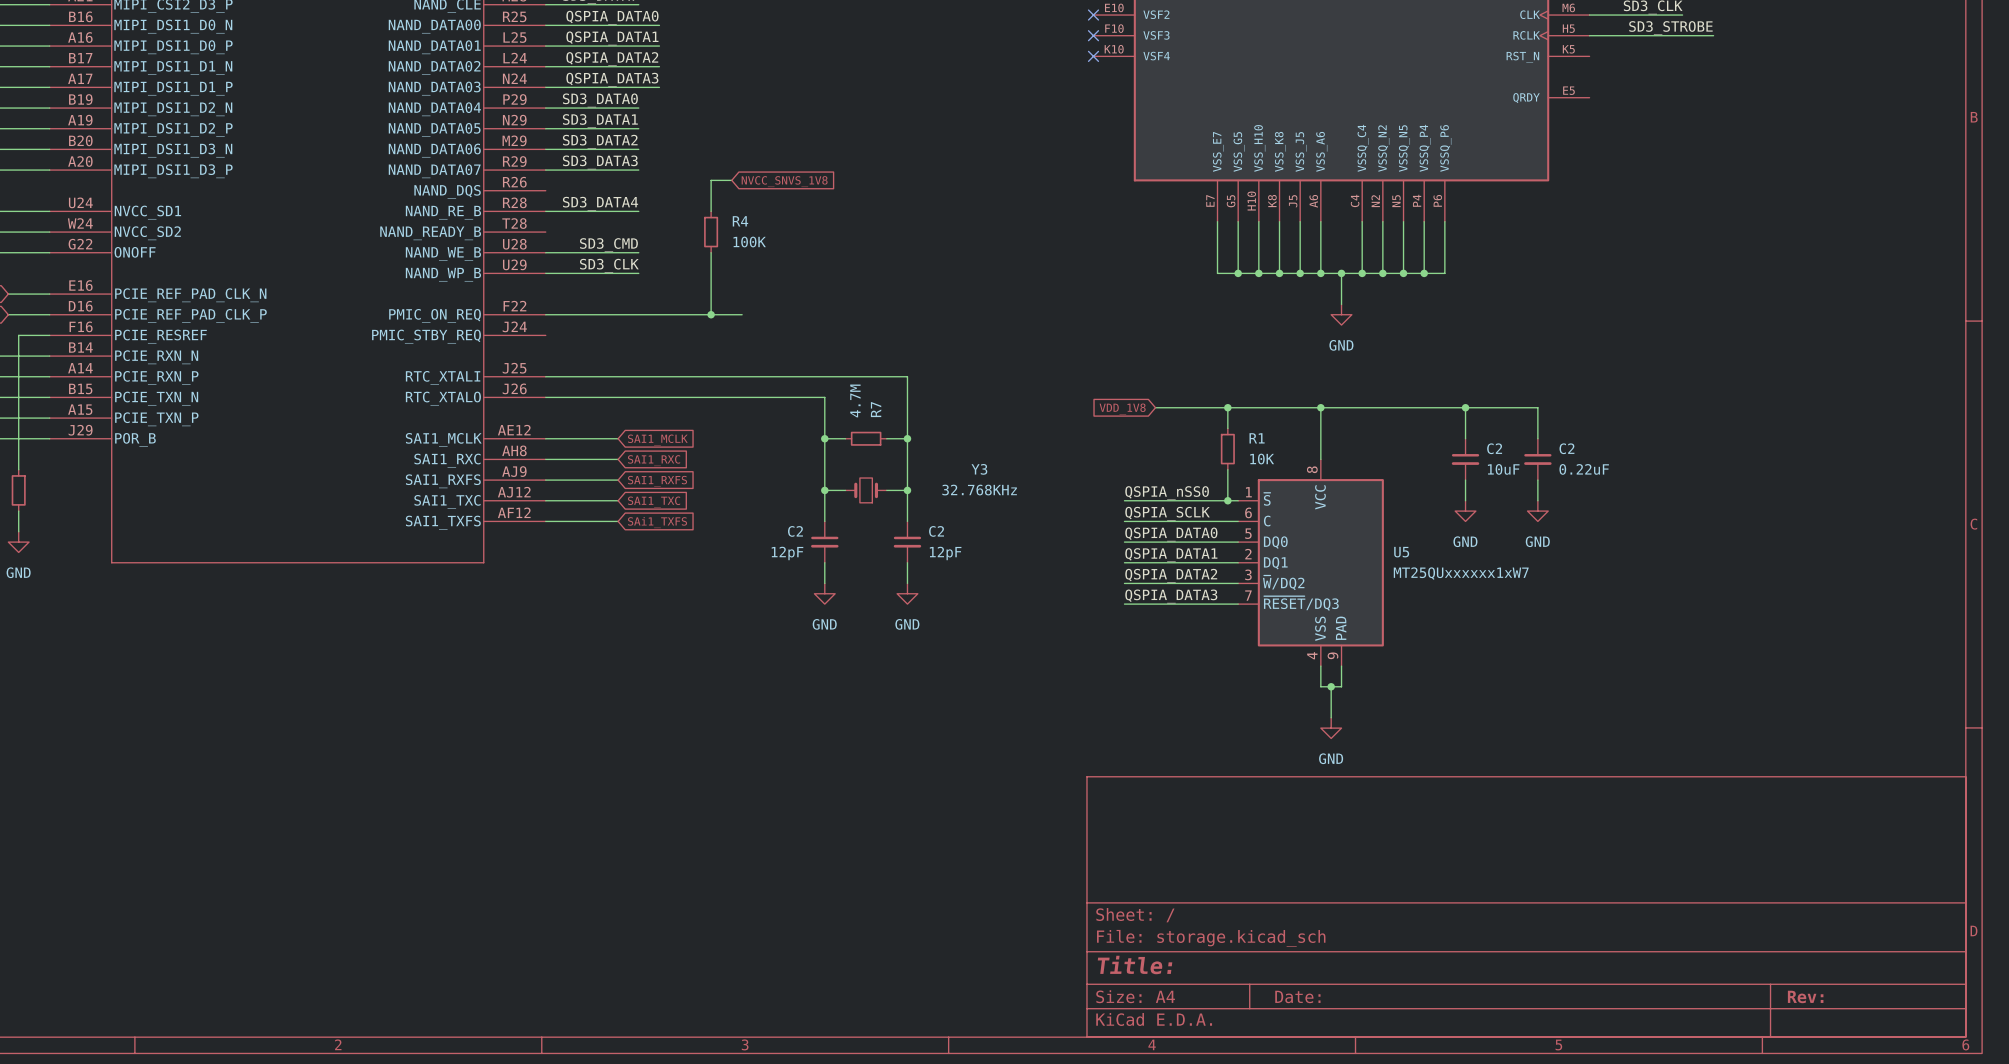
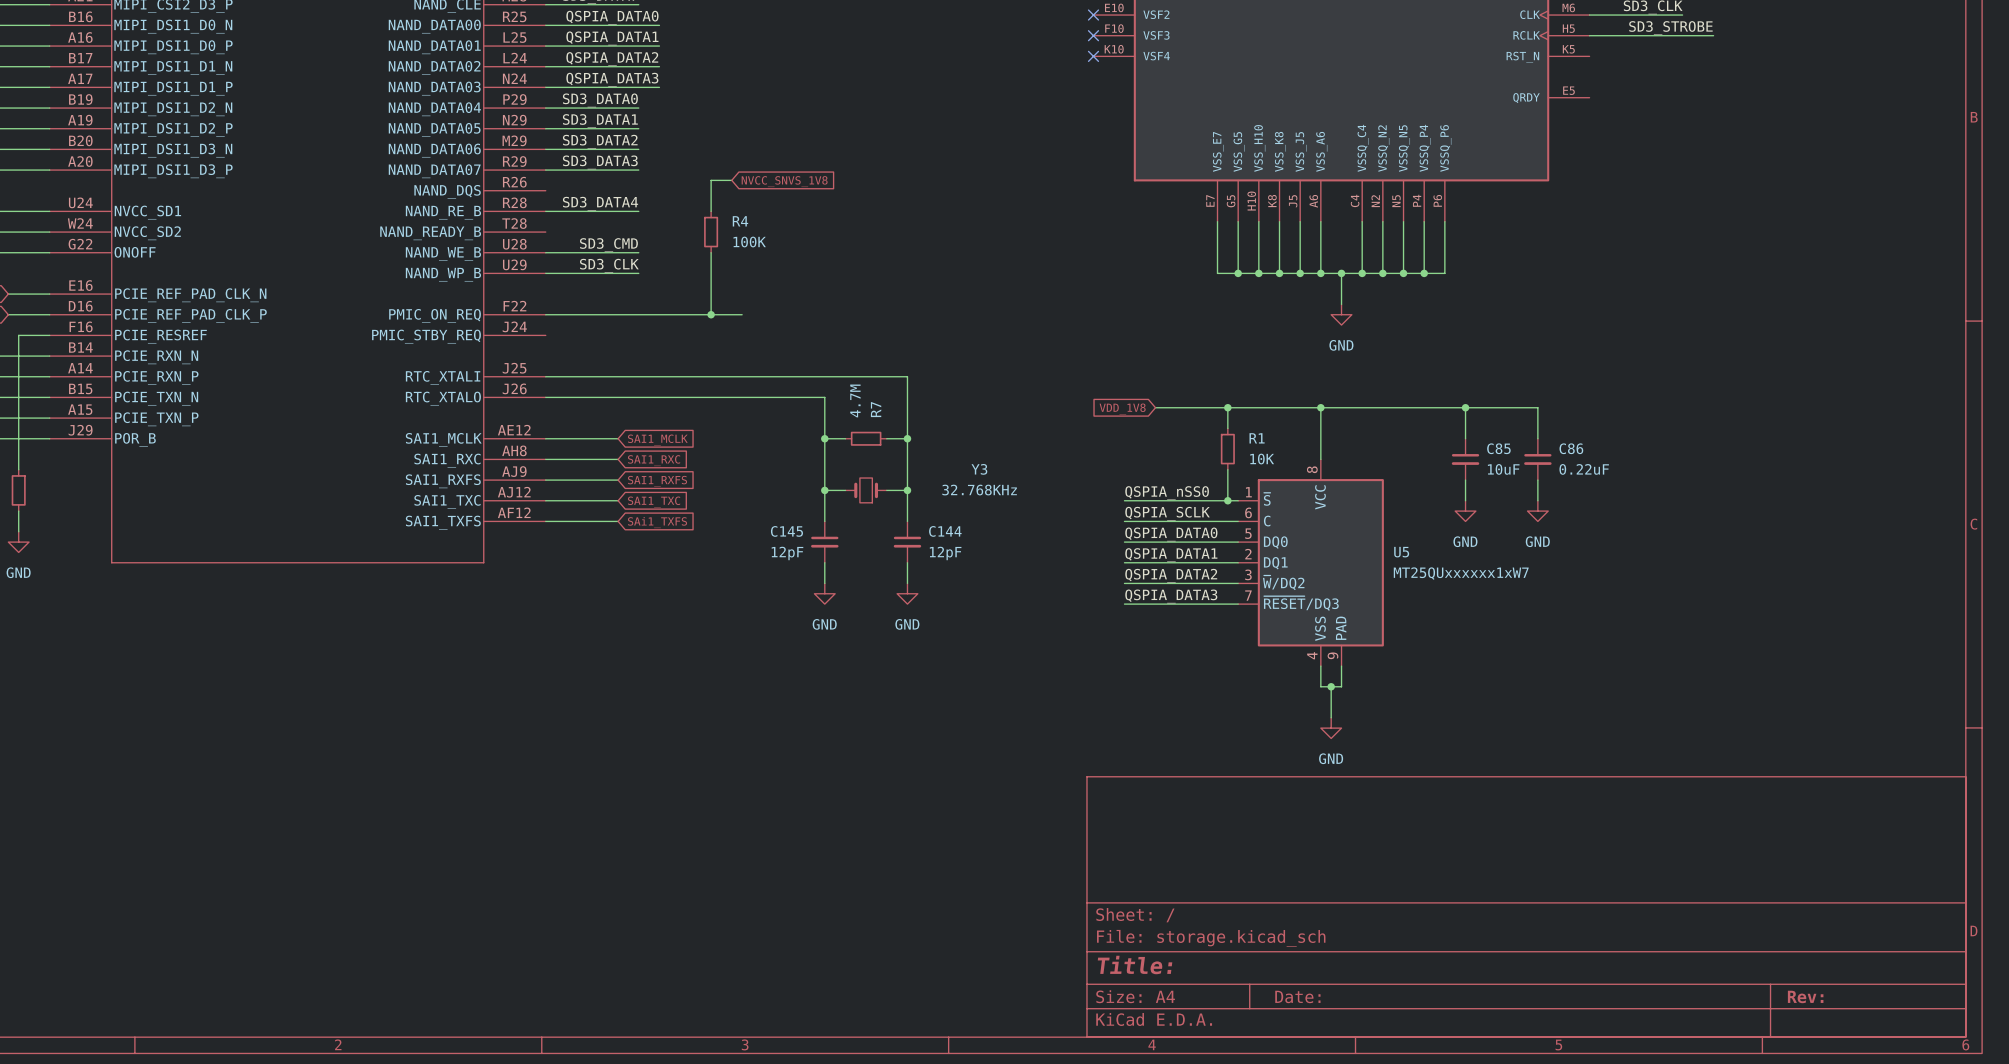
C2 name: C2 (1494, 448) -> C85 (1498, 448)
C2 name: C2 (1566, 448) -> C86 (1571, 448)
C2 name: C2 (795, 531) -> C145 (786, 531)
C2 name: C2 (936, 531) -> C144 (945, 531)

